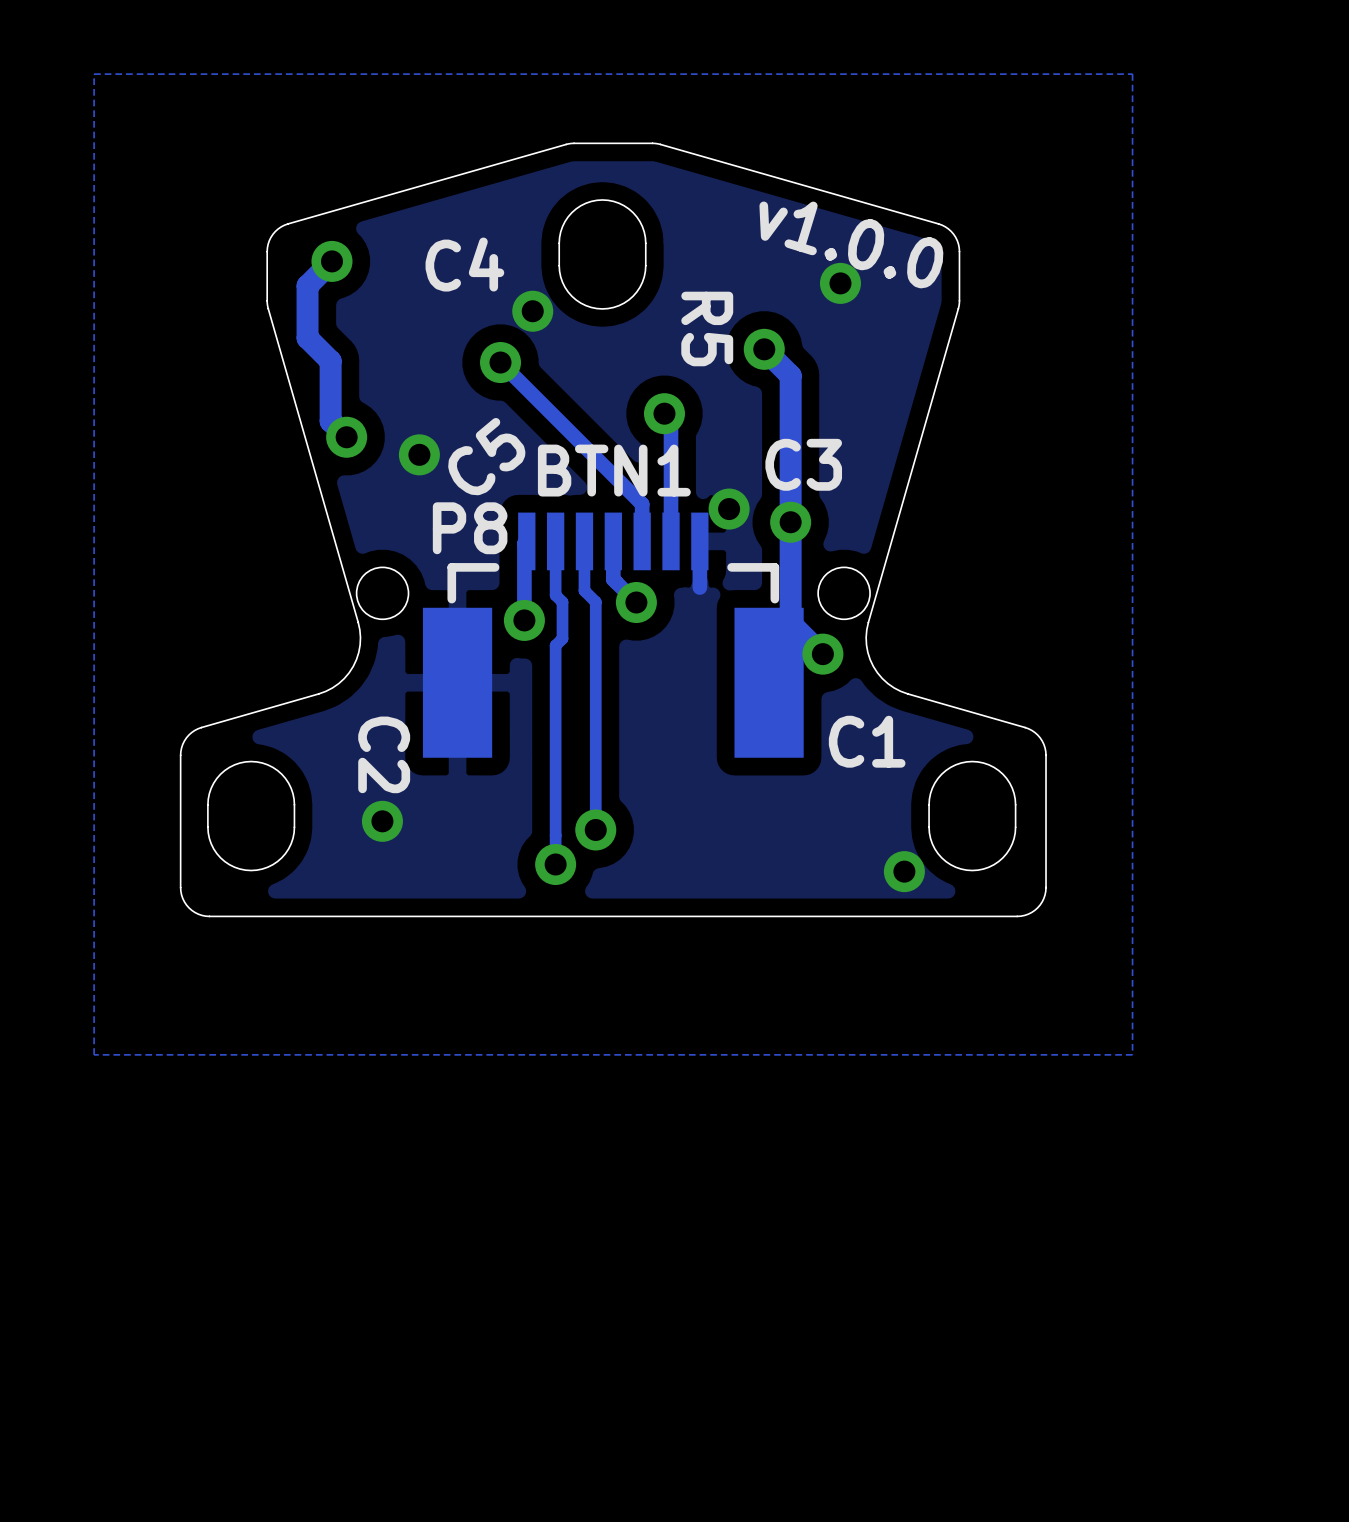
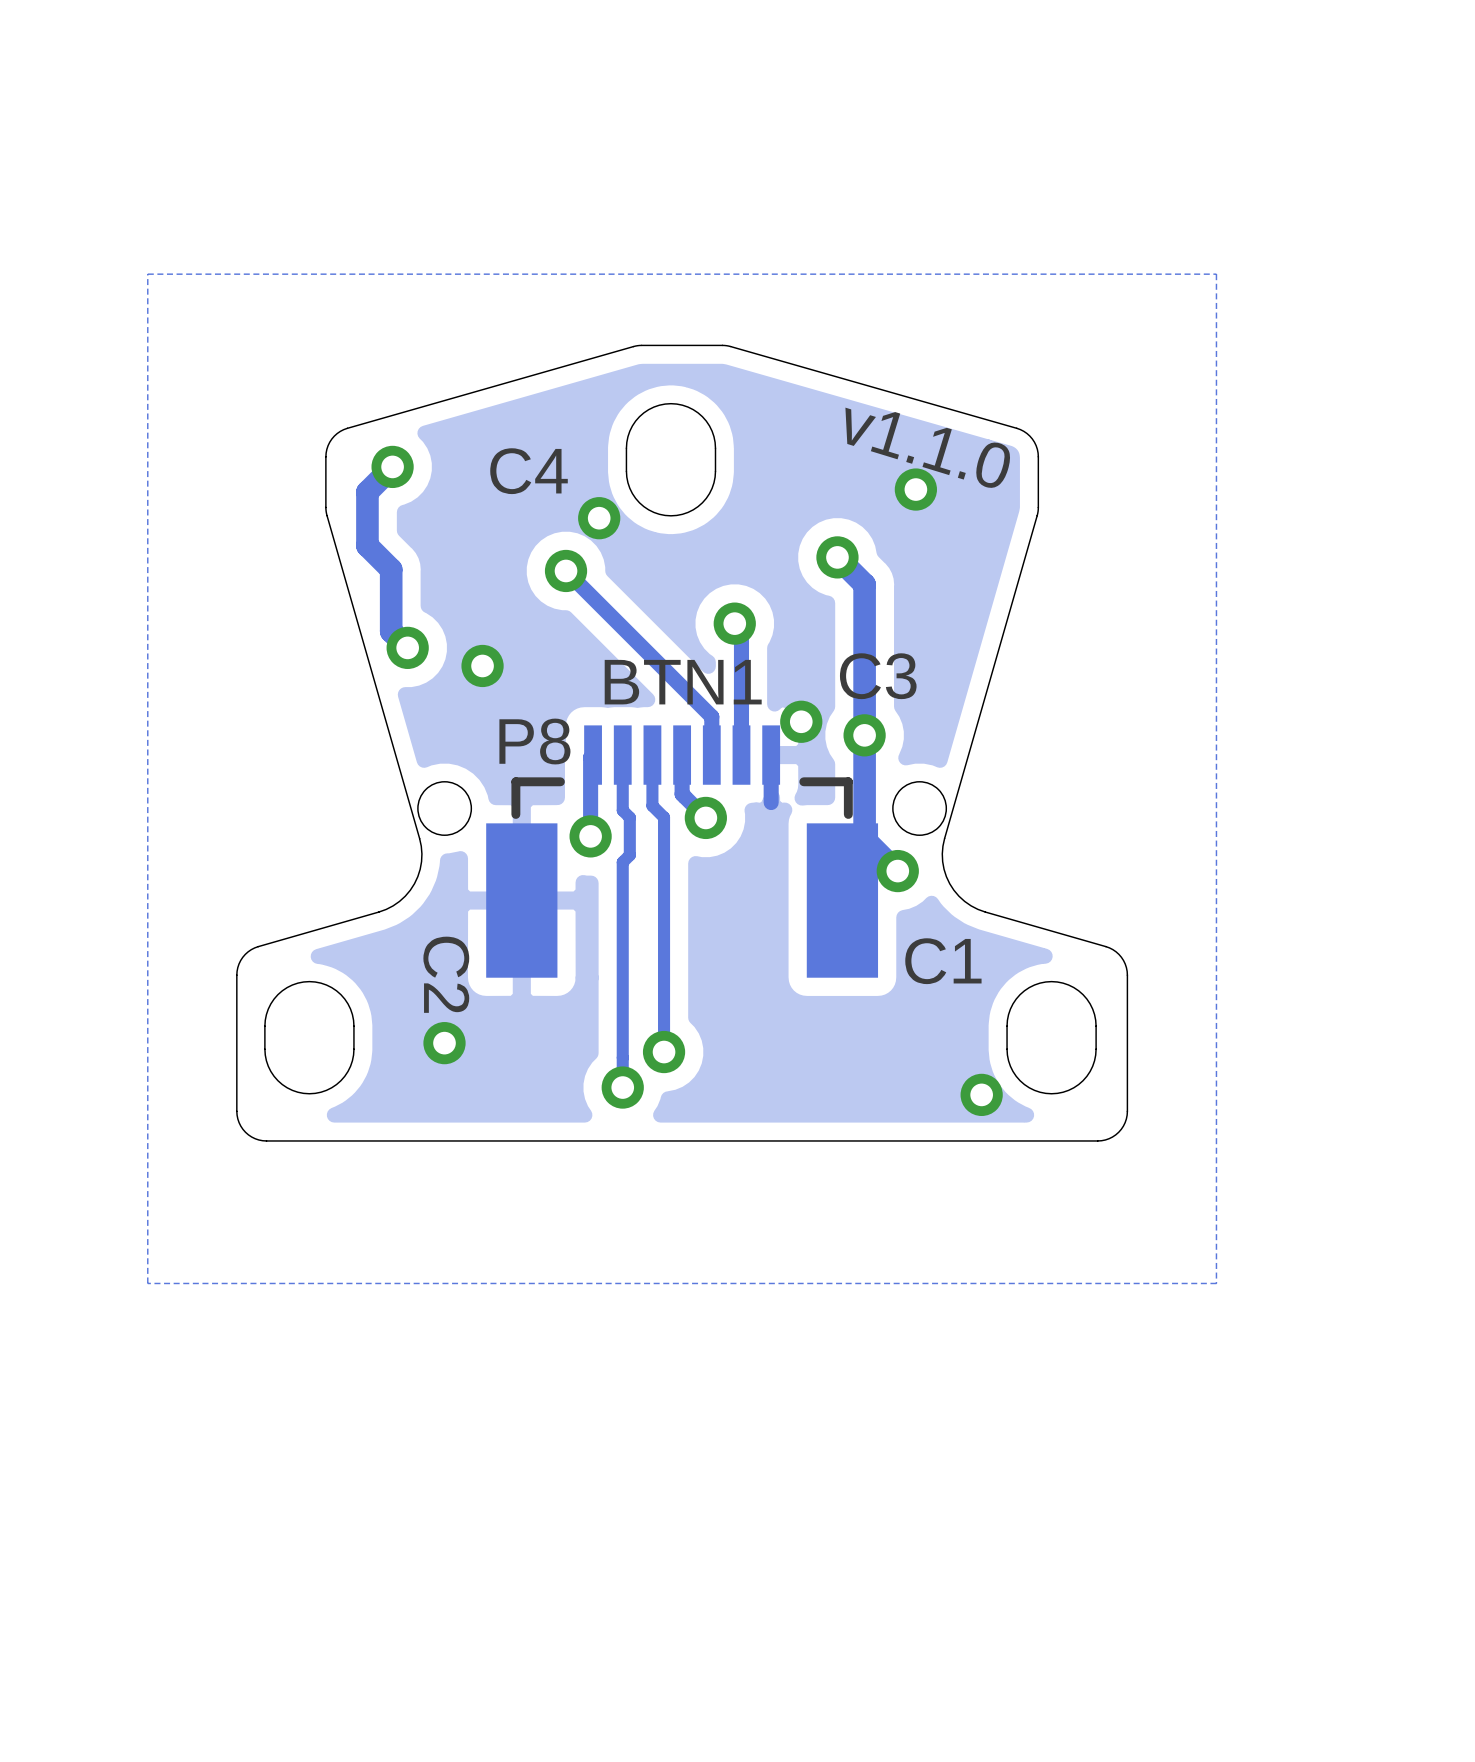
text: v1.0.0 (851, 244) -> v1.1.0 (928, 448)
R5: (707, 328) -> none
C5: (486, 456) -> none

